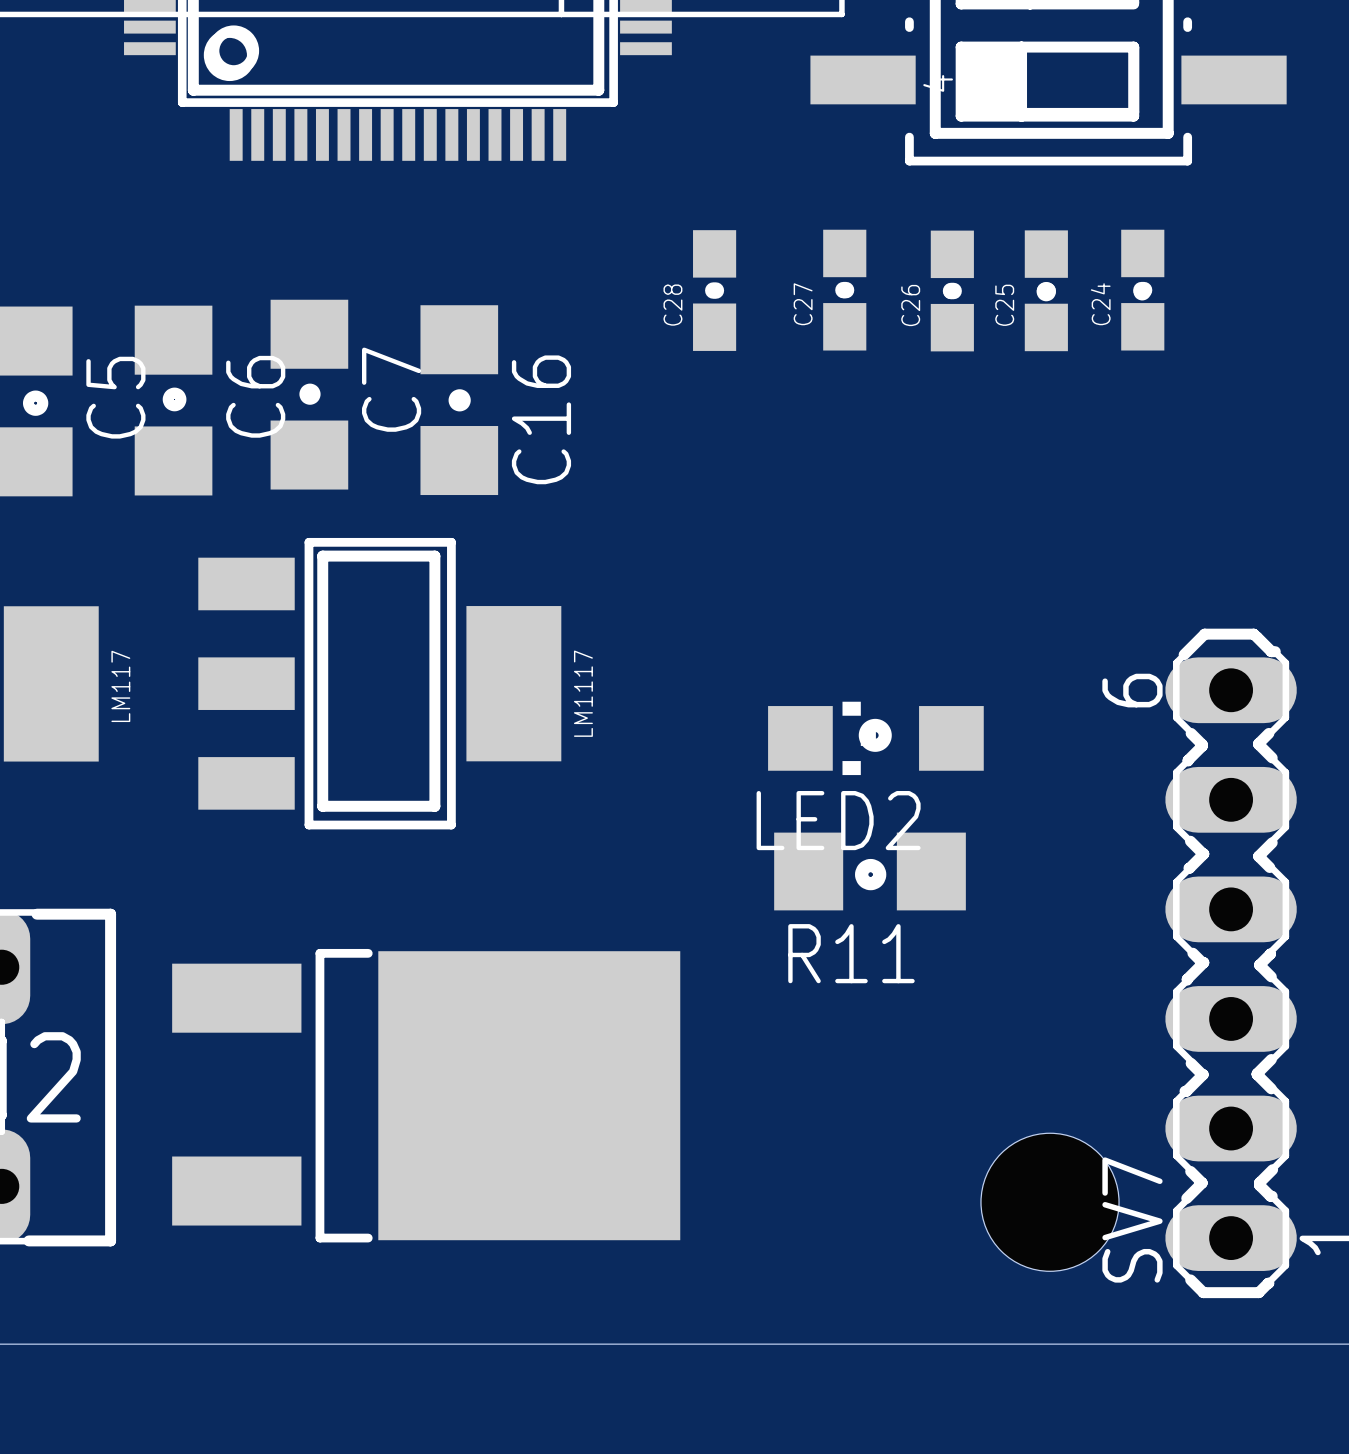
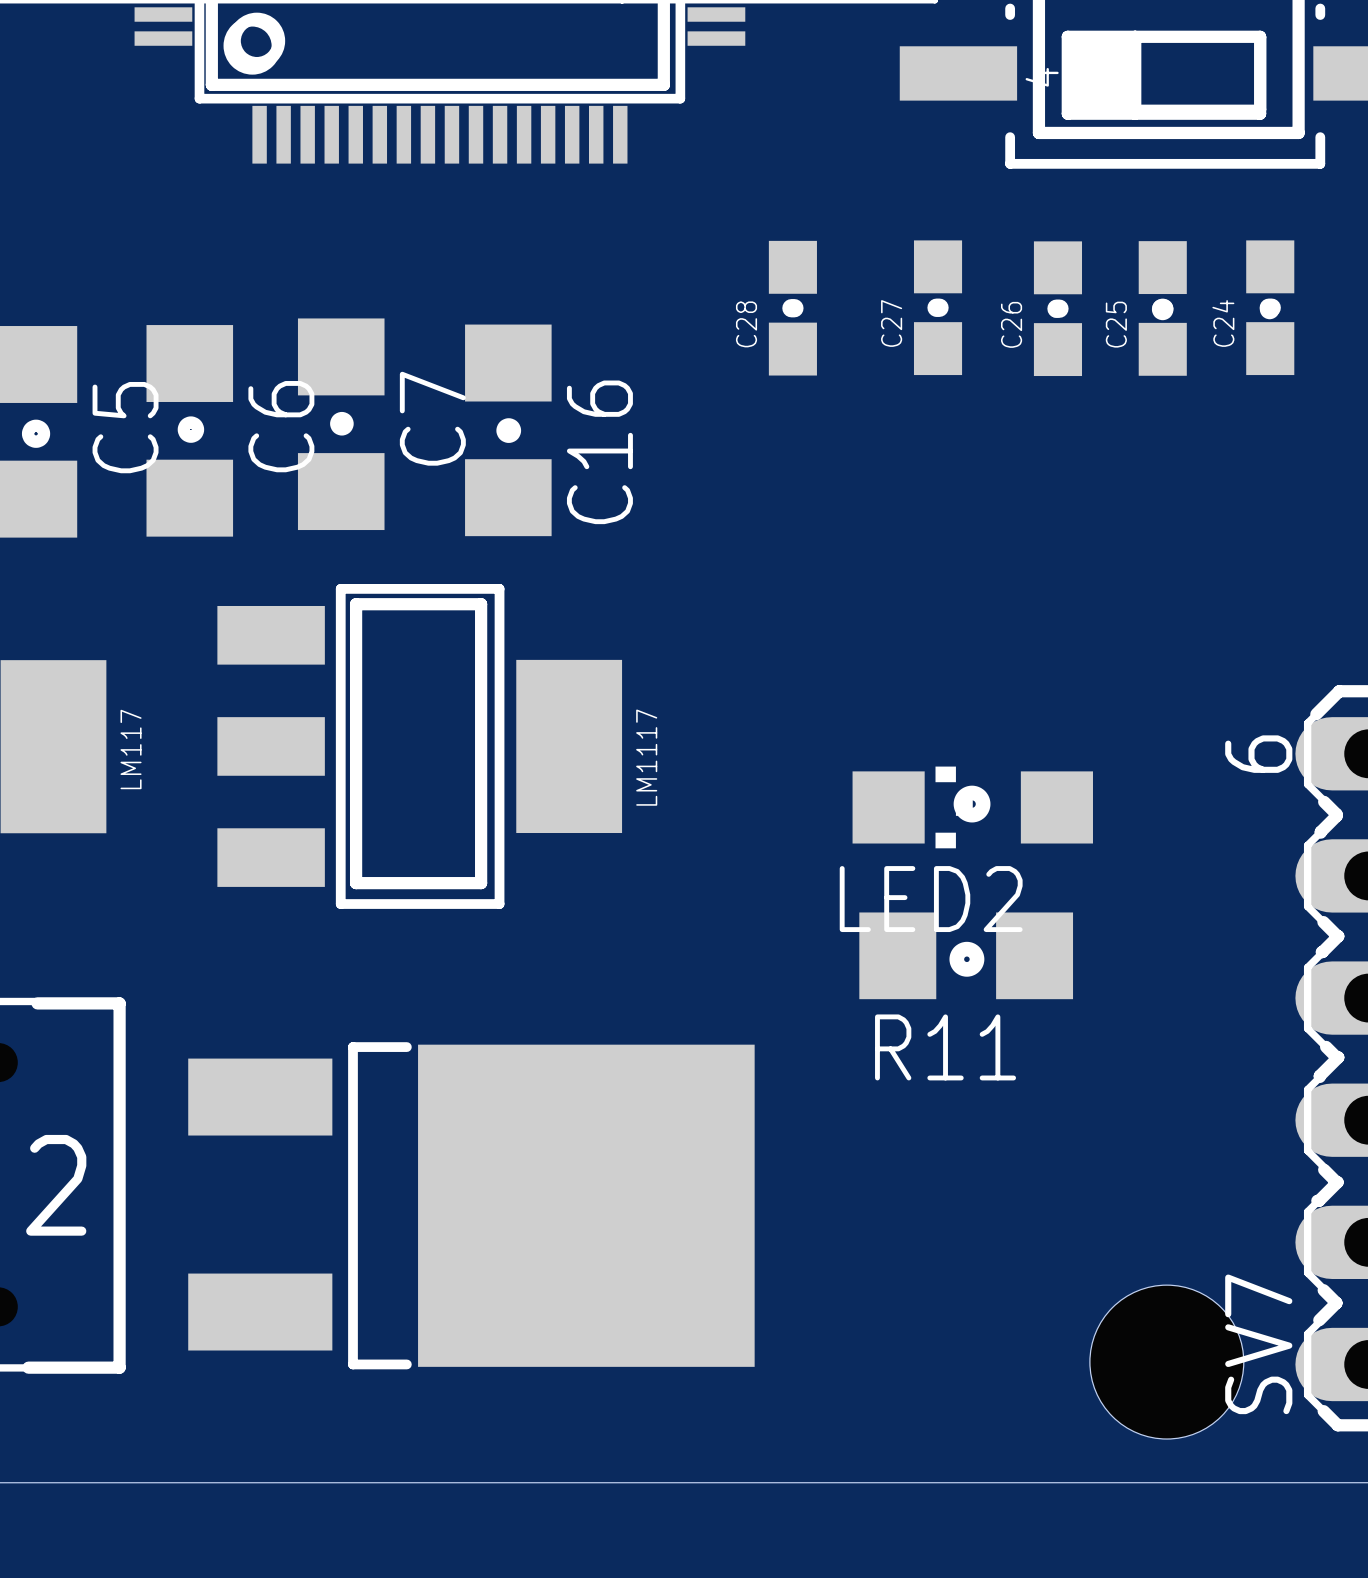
hole position: (1050, 1202) -> (1166, 1362)

